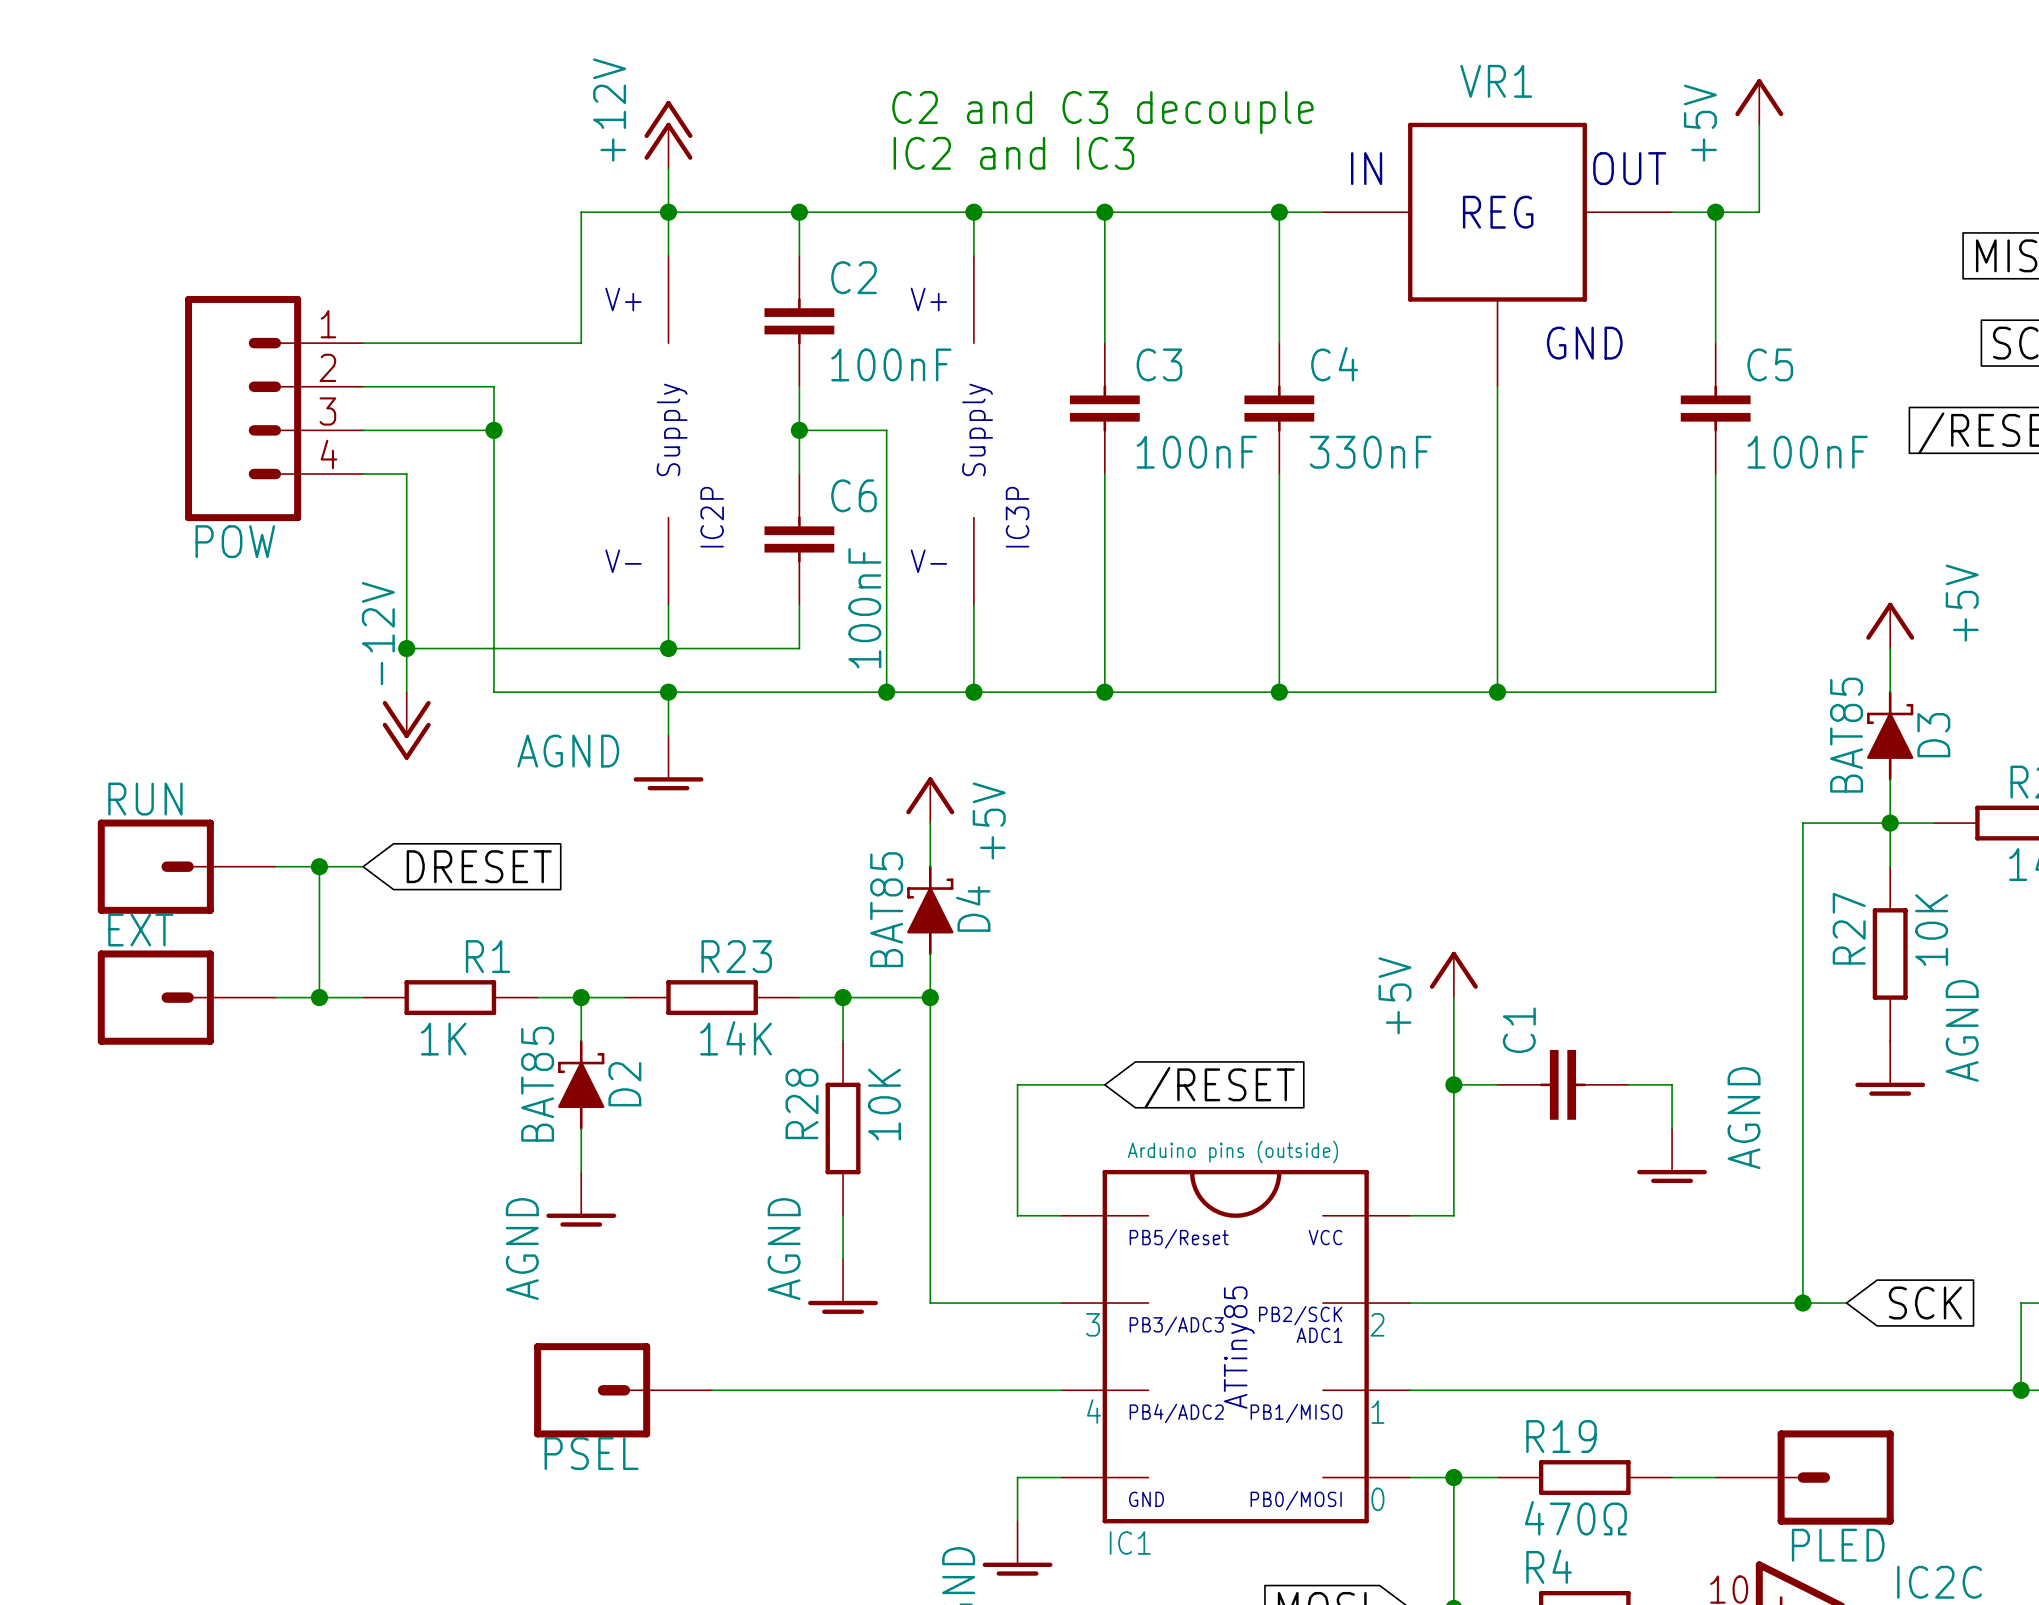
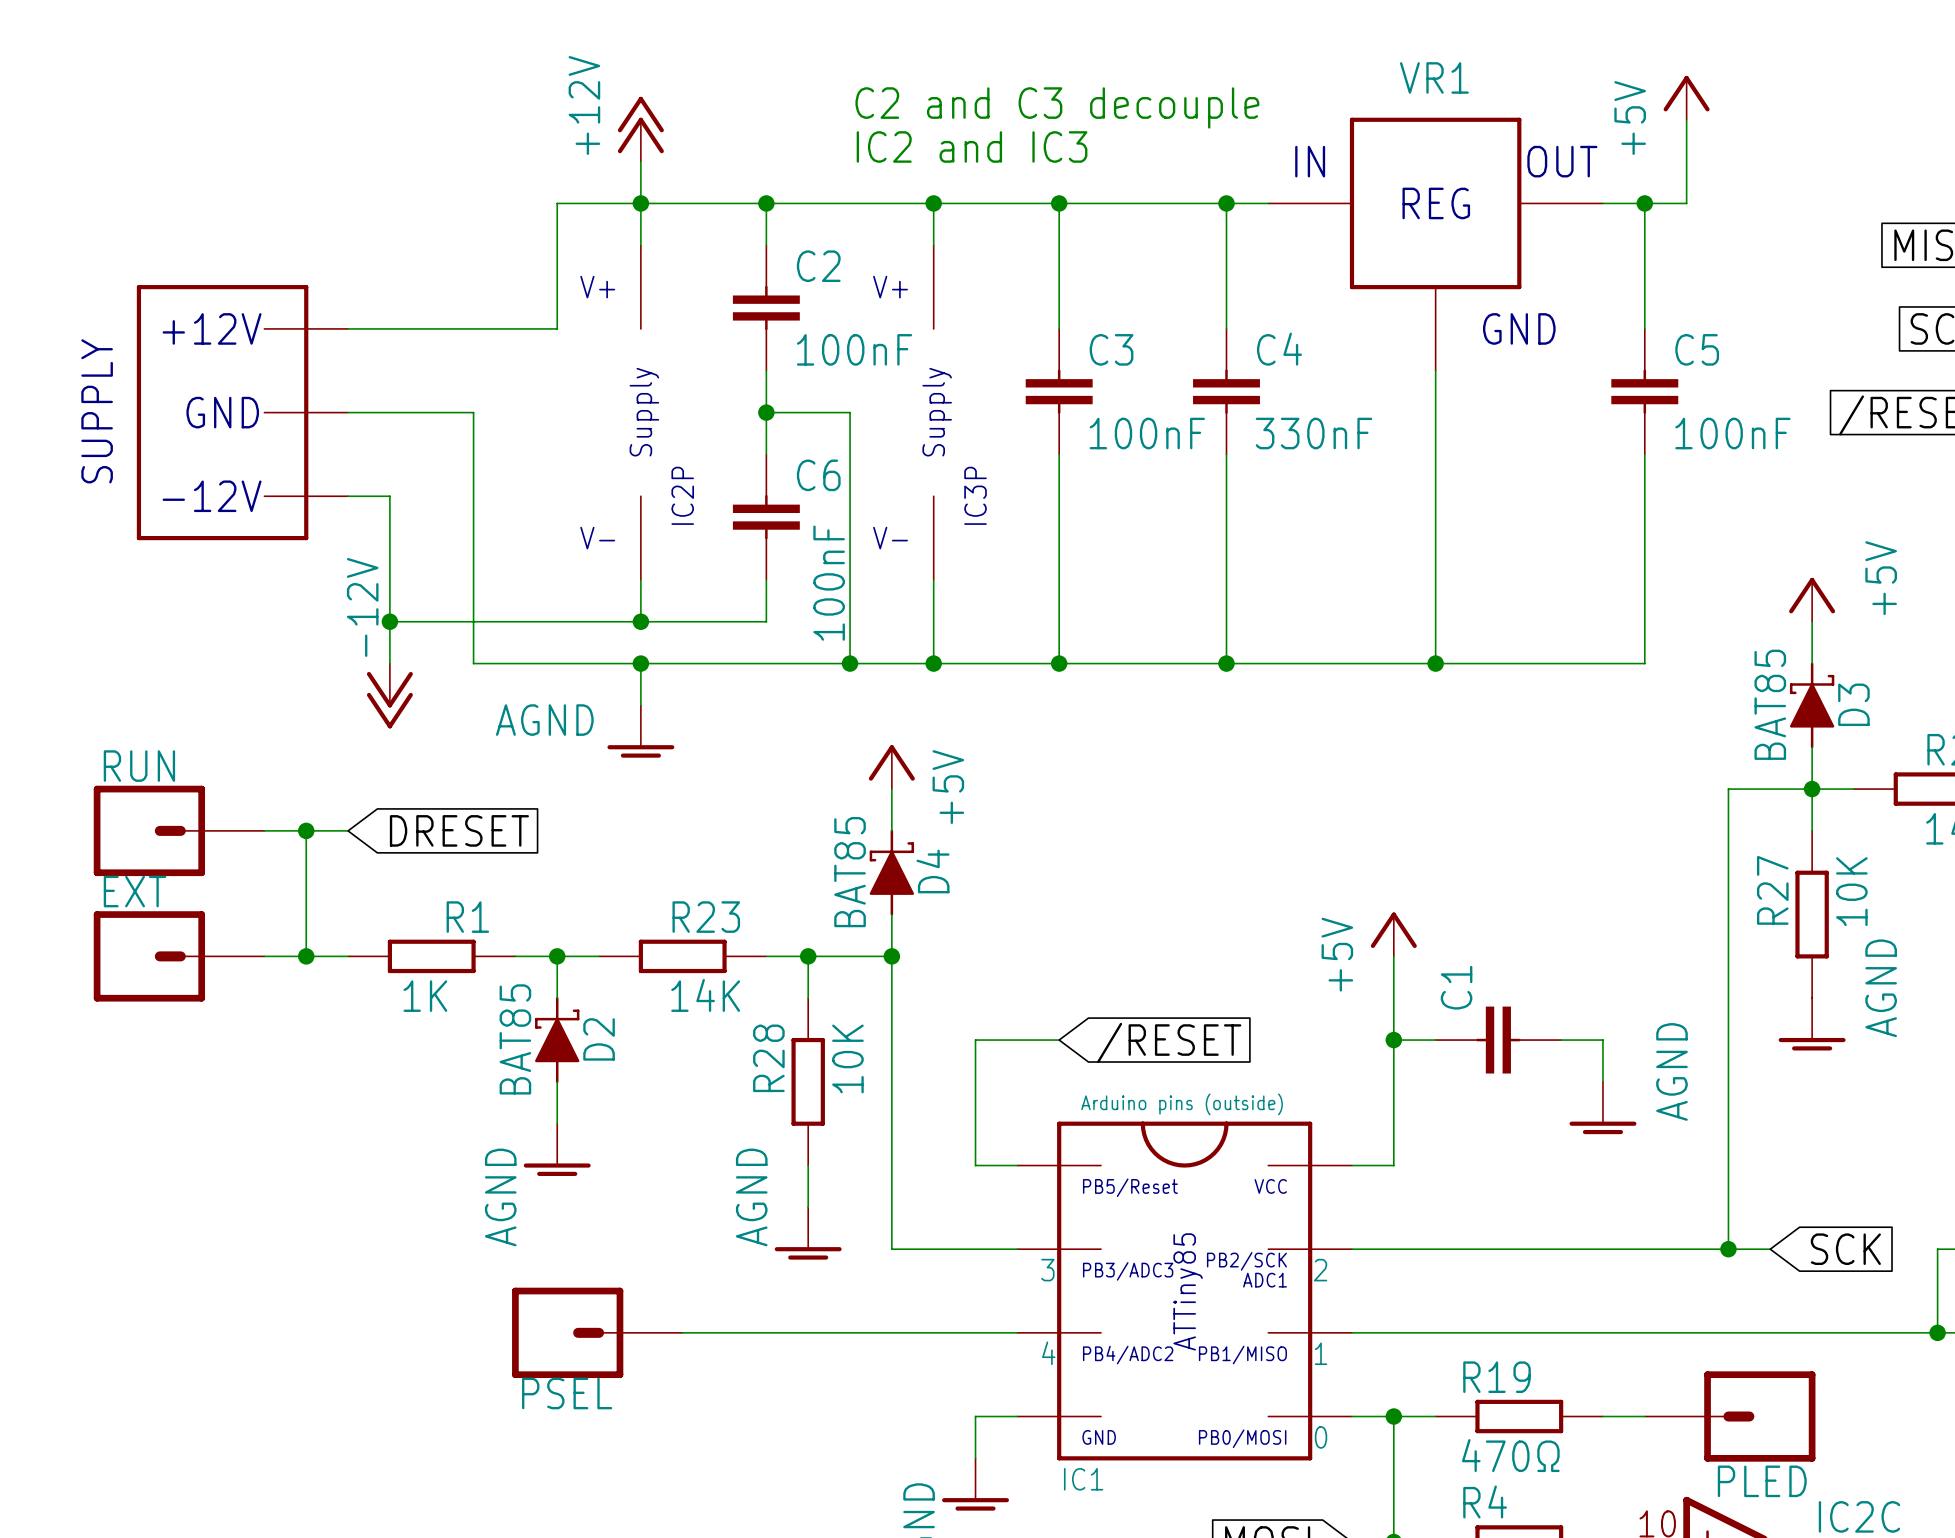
wire: (363, 386) (493, 386) (493, 430) -> none
POW: (274, 408) -> none
part: none -> (242, 412)
junction: (493, 430) -> none
wire: (363, 474) (406, 474) (406, 517) -> (348, 496) (389, 496)

